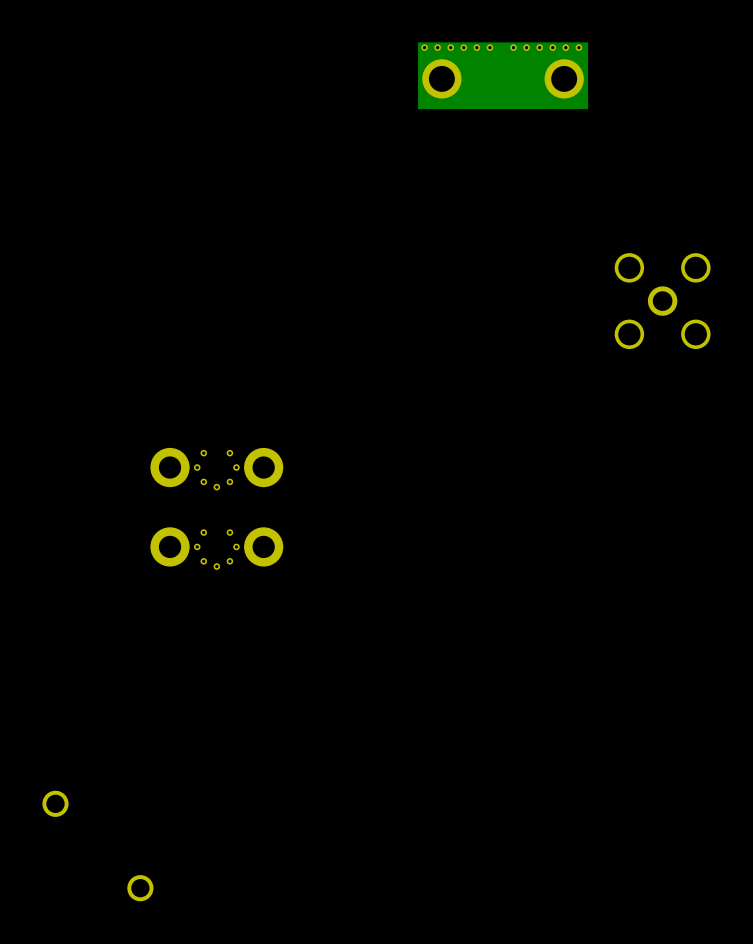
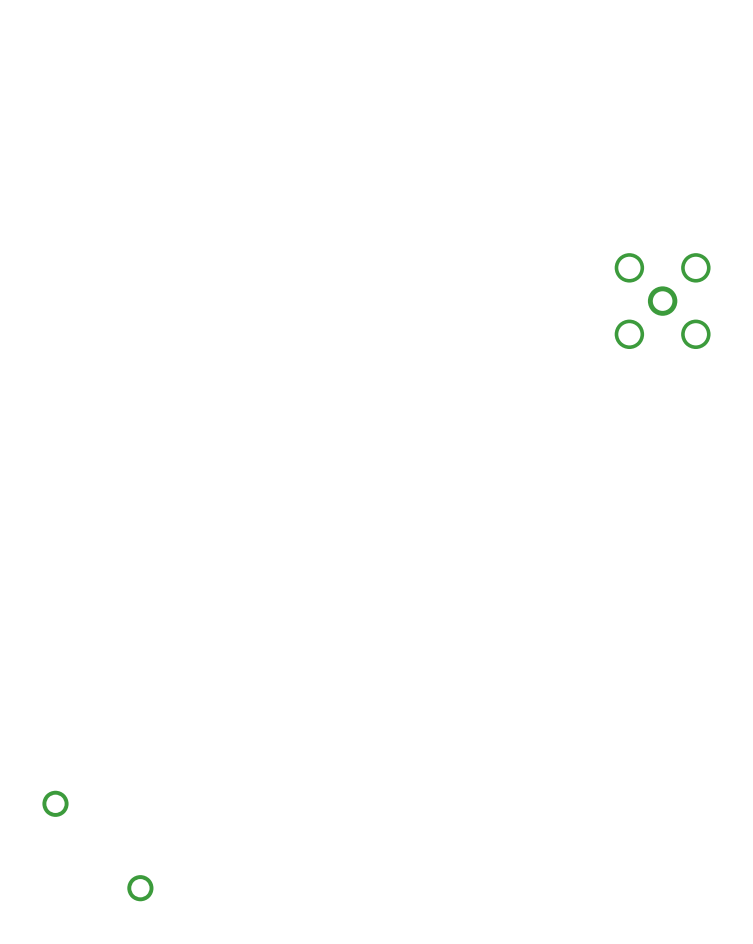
part: (503, 75) -> none
part: (216, 469) -> none
part: (216, 548) -> none

